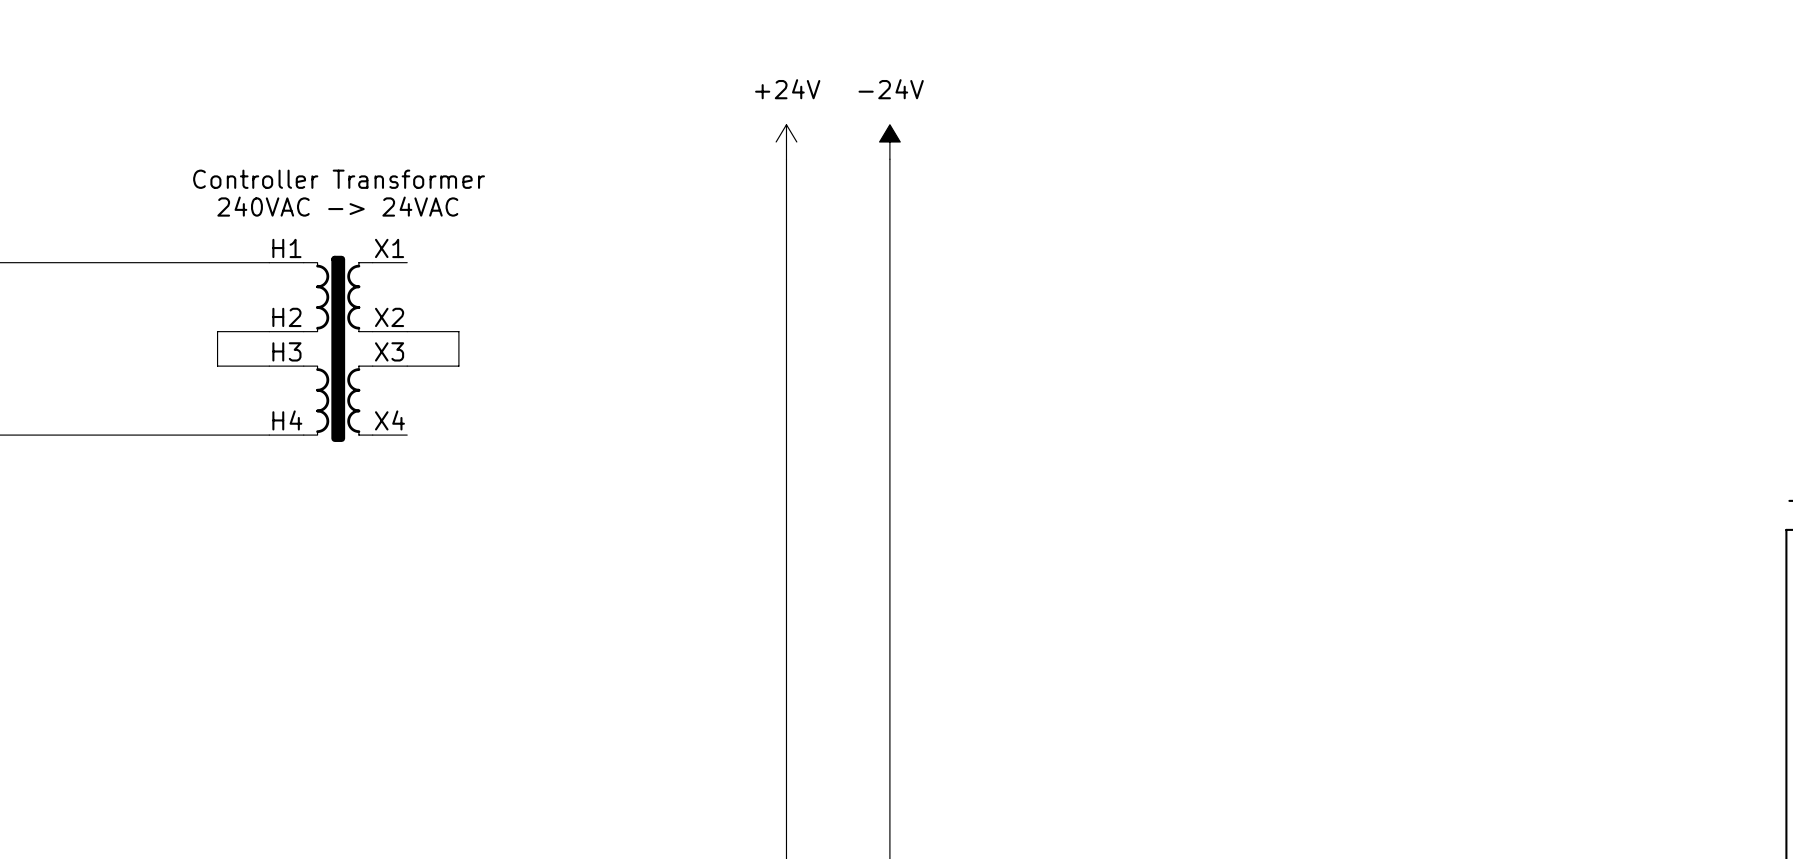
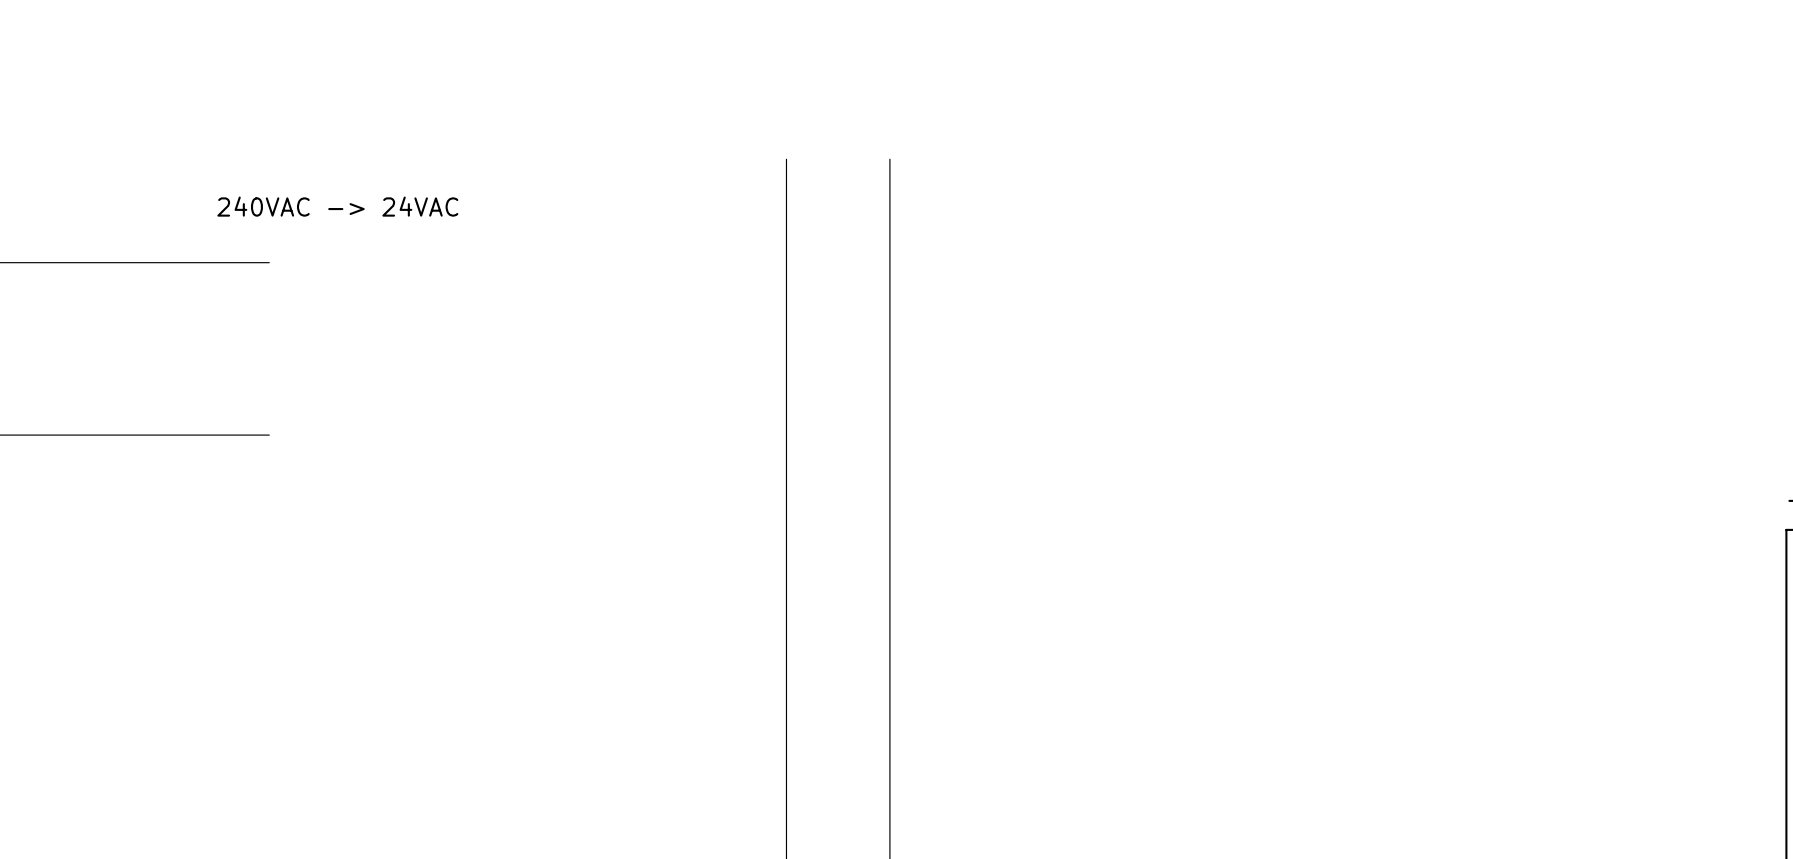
power symbol: +24V (786, 141) -> none
power symbol: -24V (889, 141) -> none
text: Controller Transformer (339, 179) -> none
wire: (269, 331) (217, 331) (217, 366) (269, 366) -> none
wire: (407, 331) (458, 331) (458, 366) (407, 366) -> none
part: (338, 348) -> none

